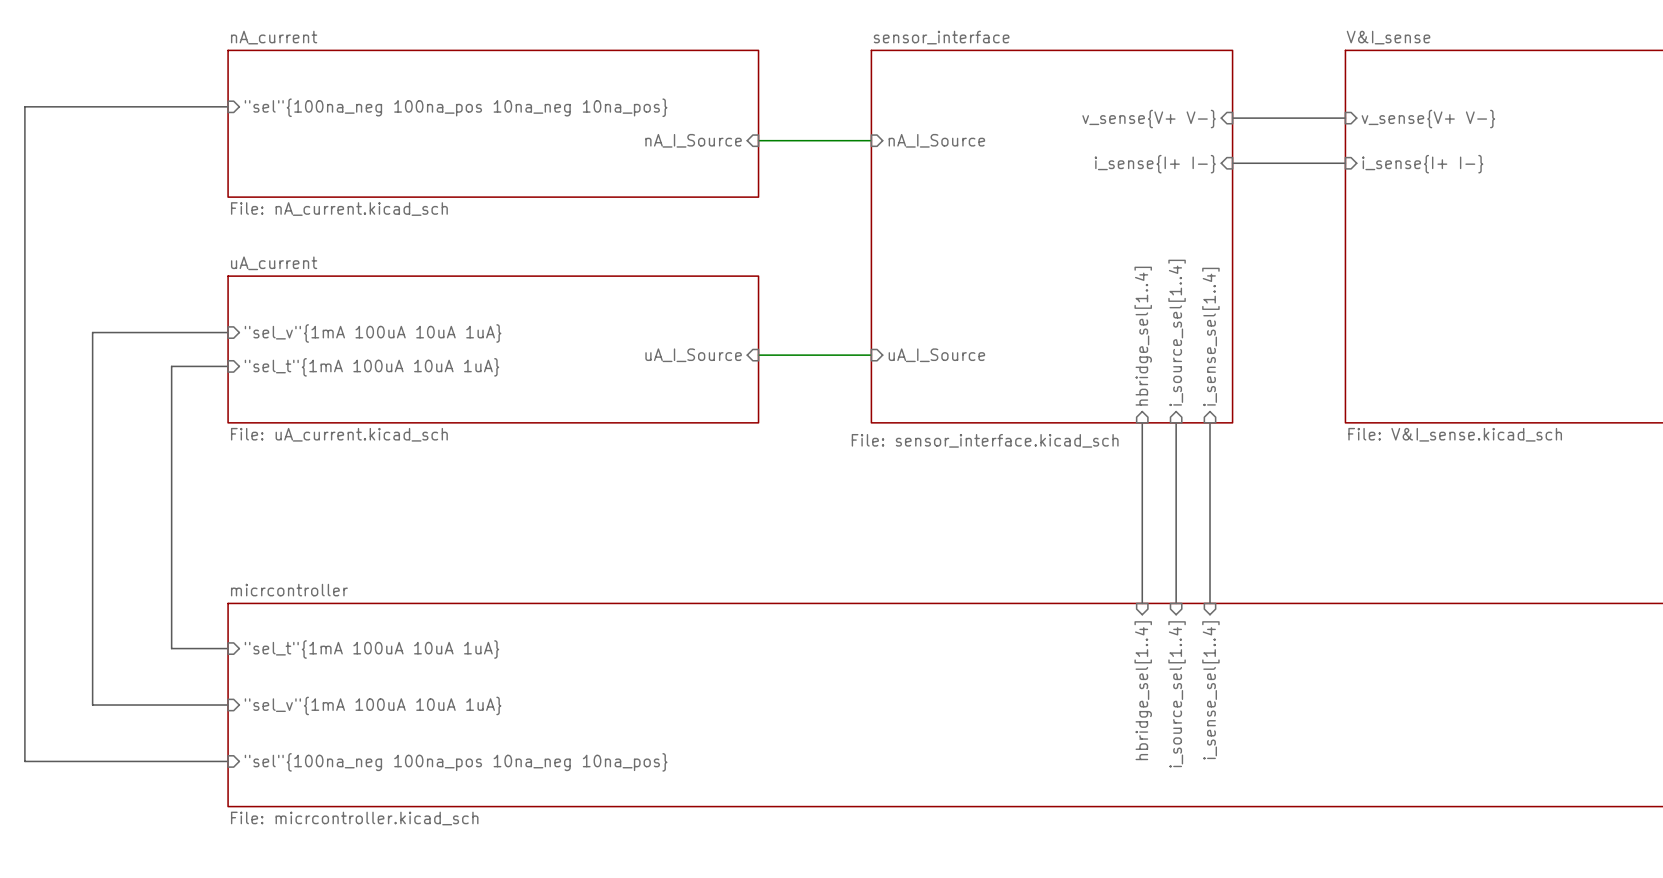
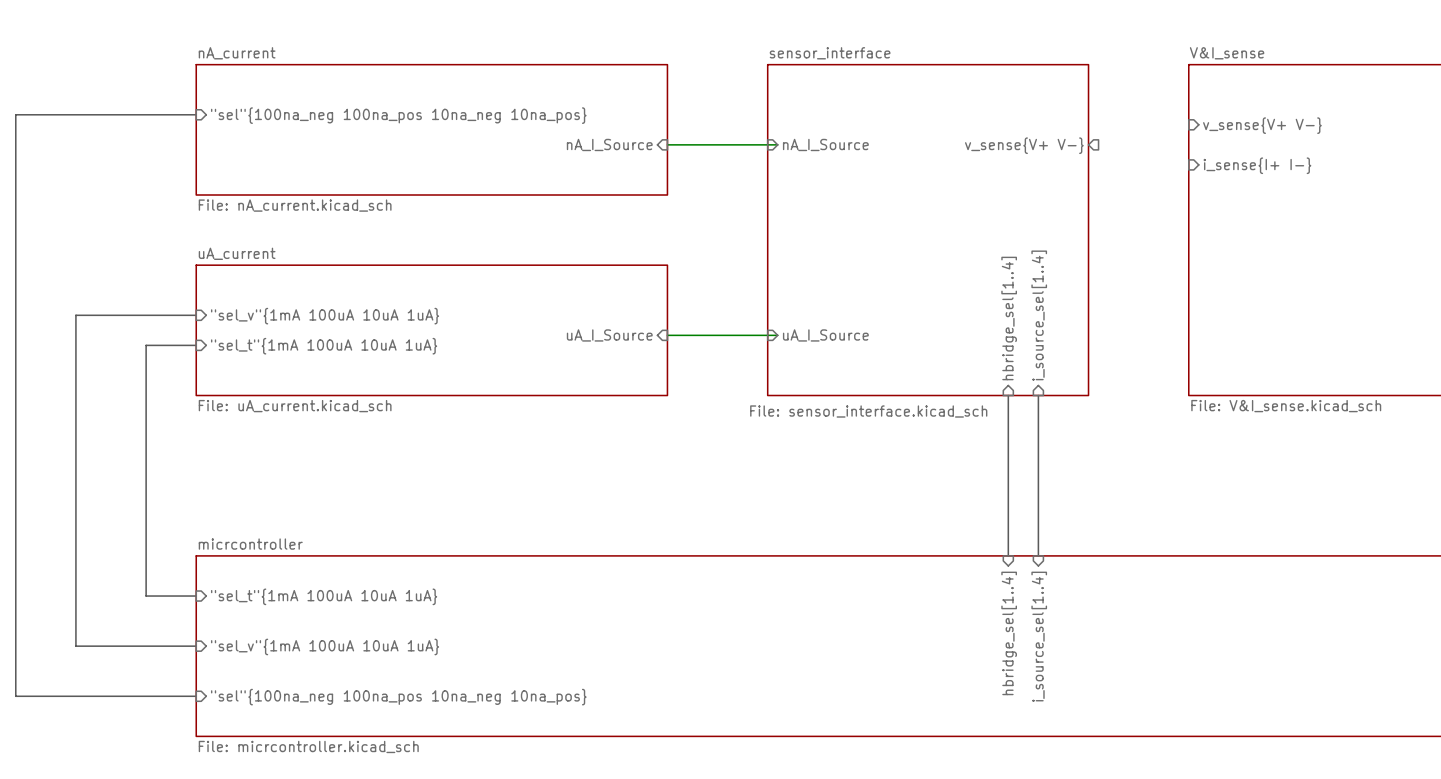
bus: (1232, 118) (1345, 118) -> none
sheet pin position: v_sense{V+ V-} (1149, 119) -> v_sense{V+ V-} (1024, 145)
wire: none -> (767, 144) (777, 144)
bus: (1232, 163) (1345, 163) -> none
sheet pin: i_sense{I+ I-} (1155, 164) -> none
sheet pin: i_sense_sel[1..4] (1210, 336) -> none
wire: none -> (767, 335) (777, 335)
bus: (1210, 422) (1210, 603) -> none
sheet pin: i_sense_sel[1..4] (1210, 690) -> none

